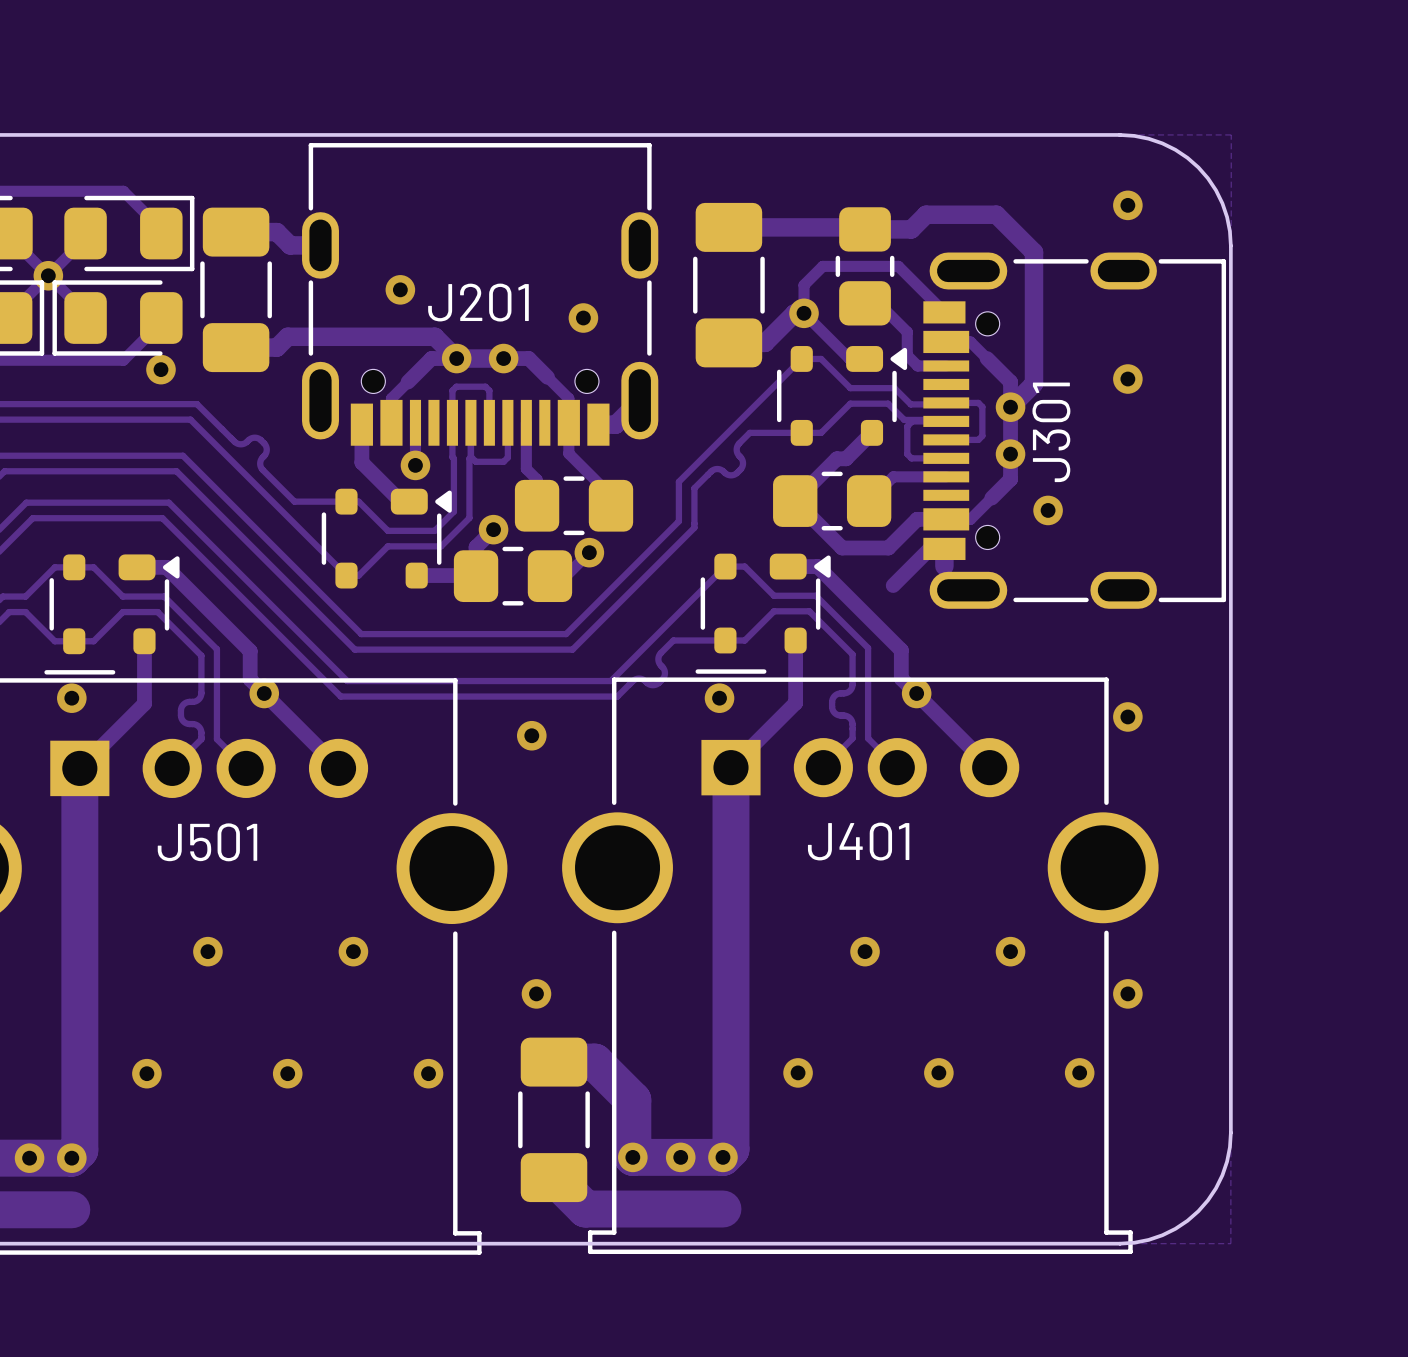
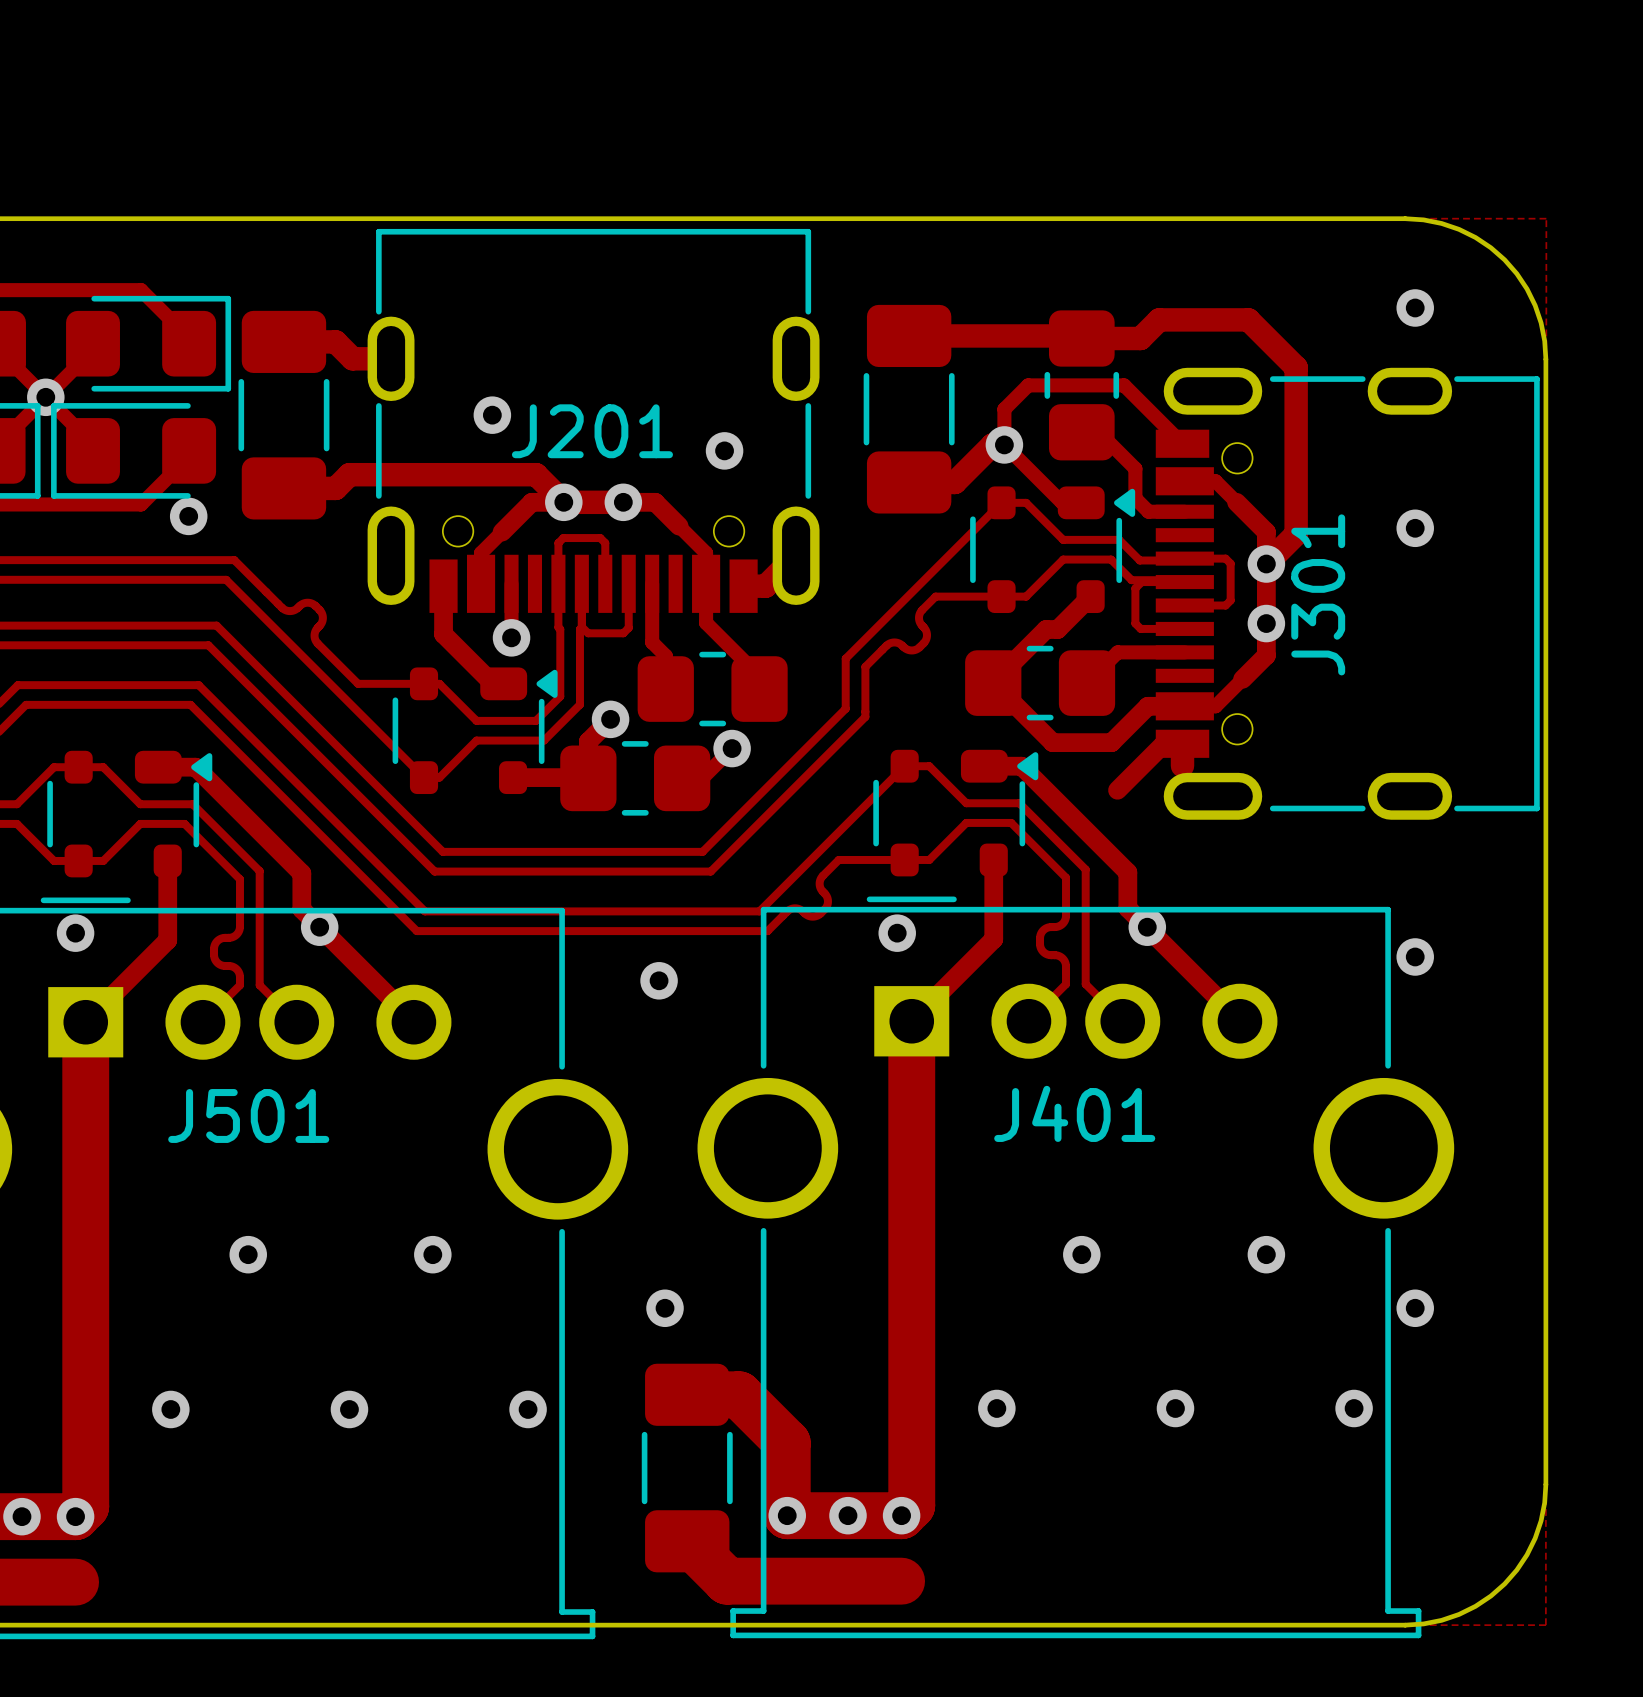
via: (1048, 510) -> none

